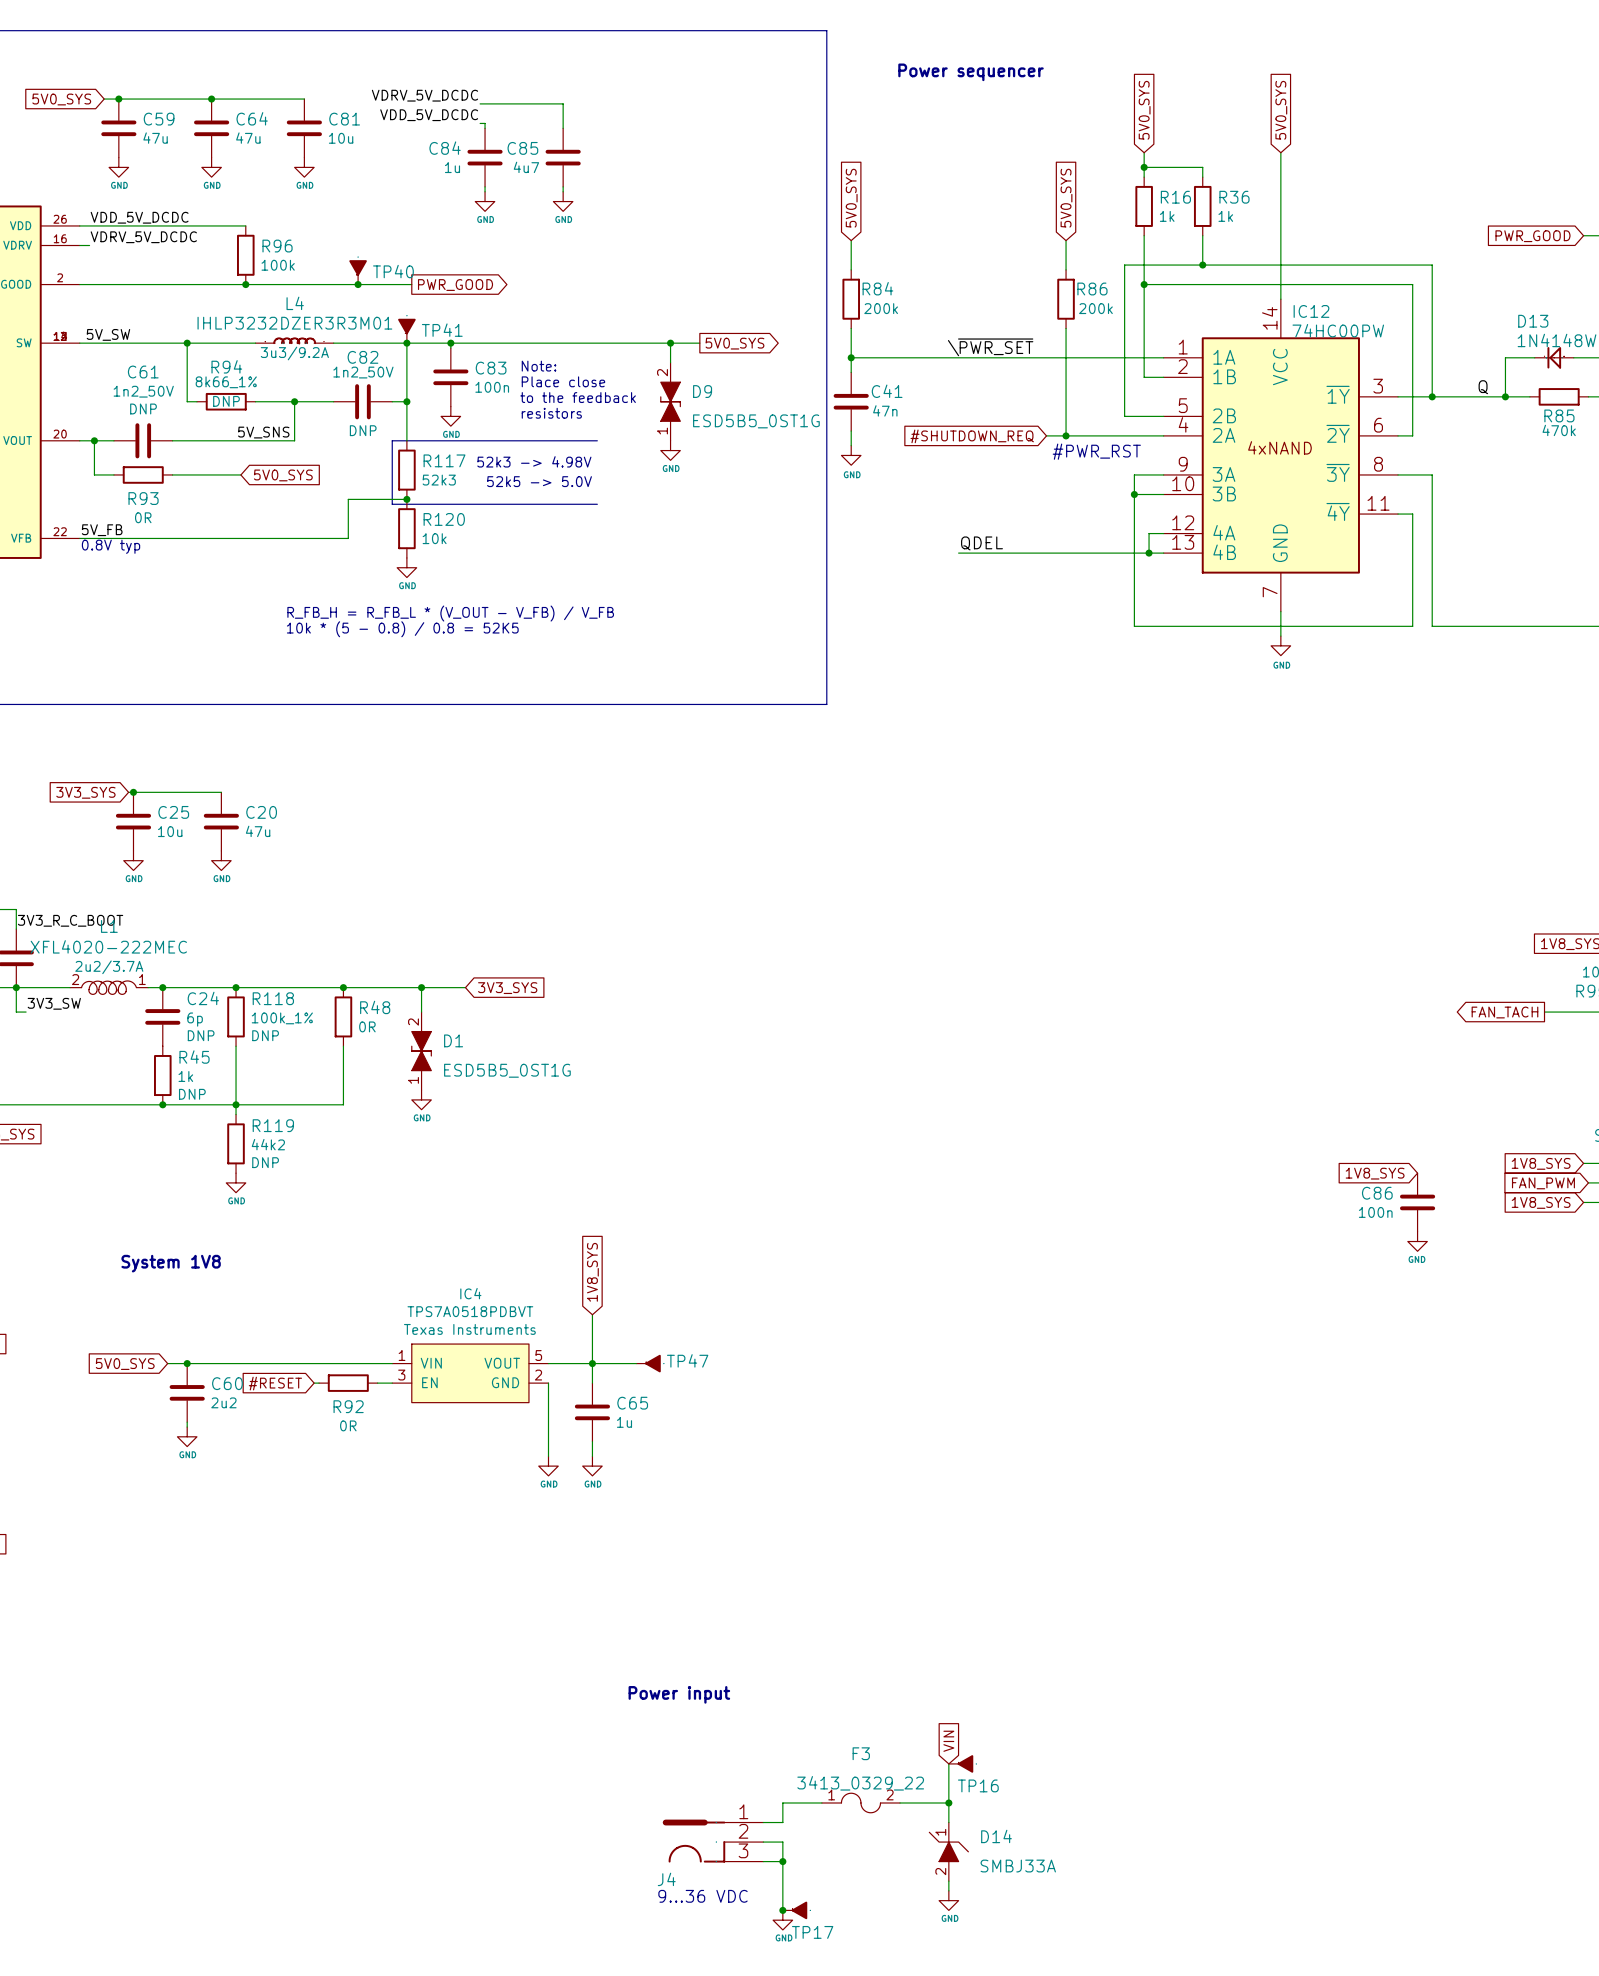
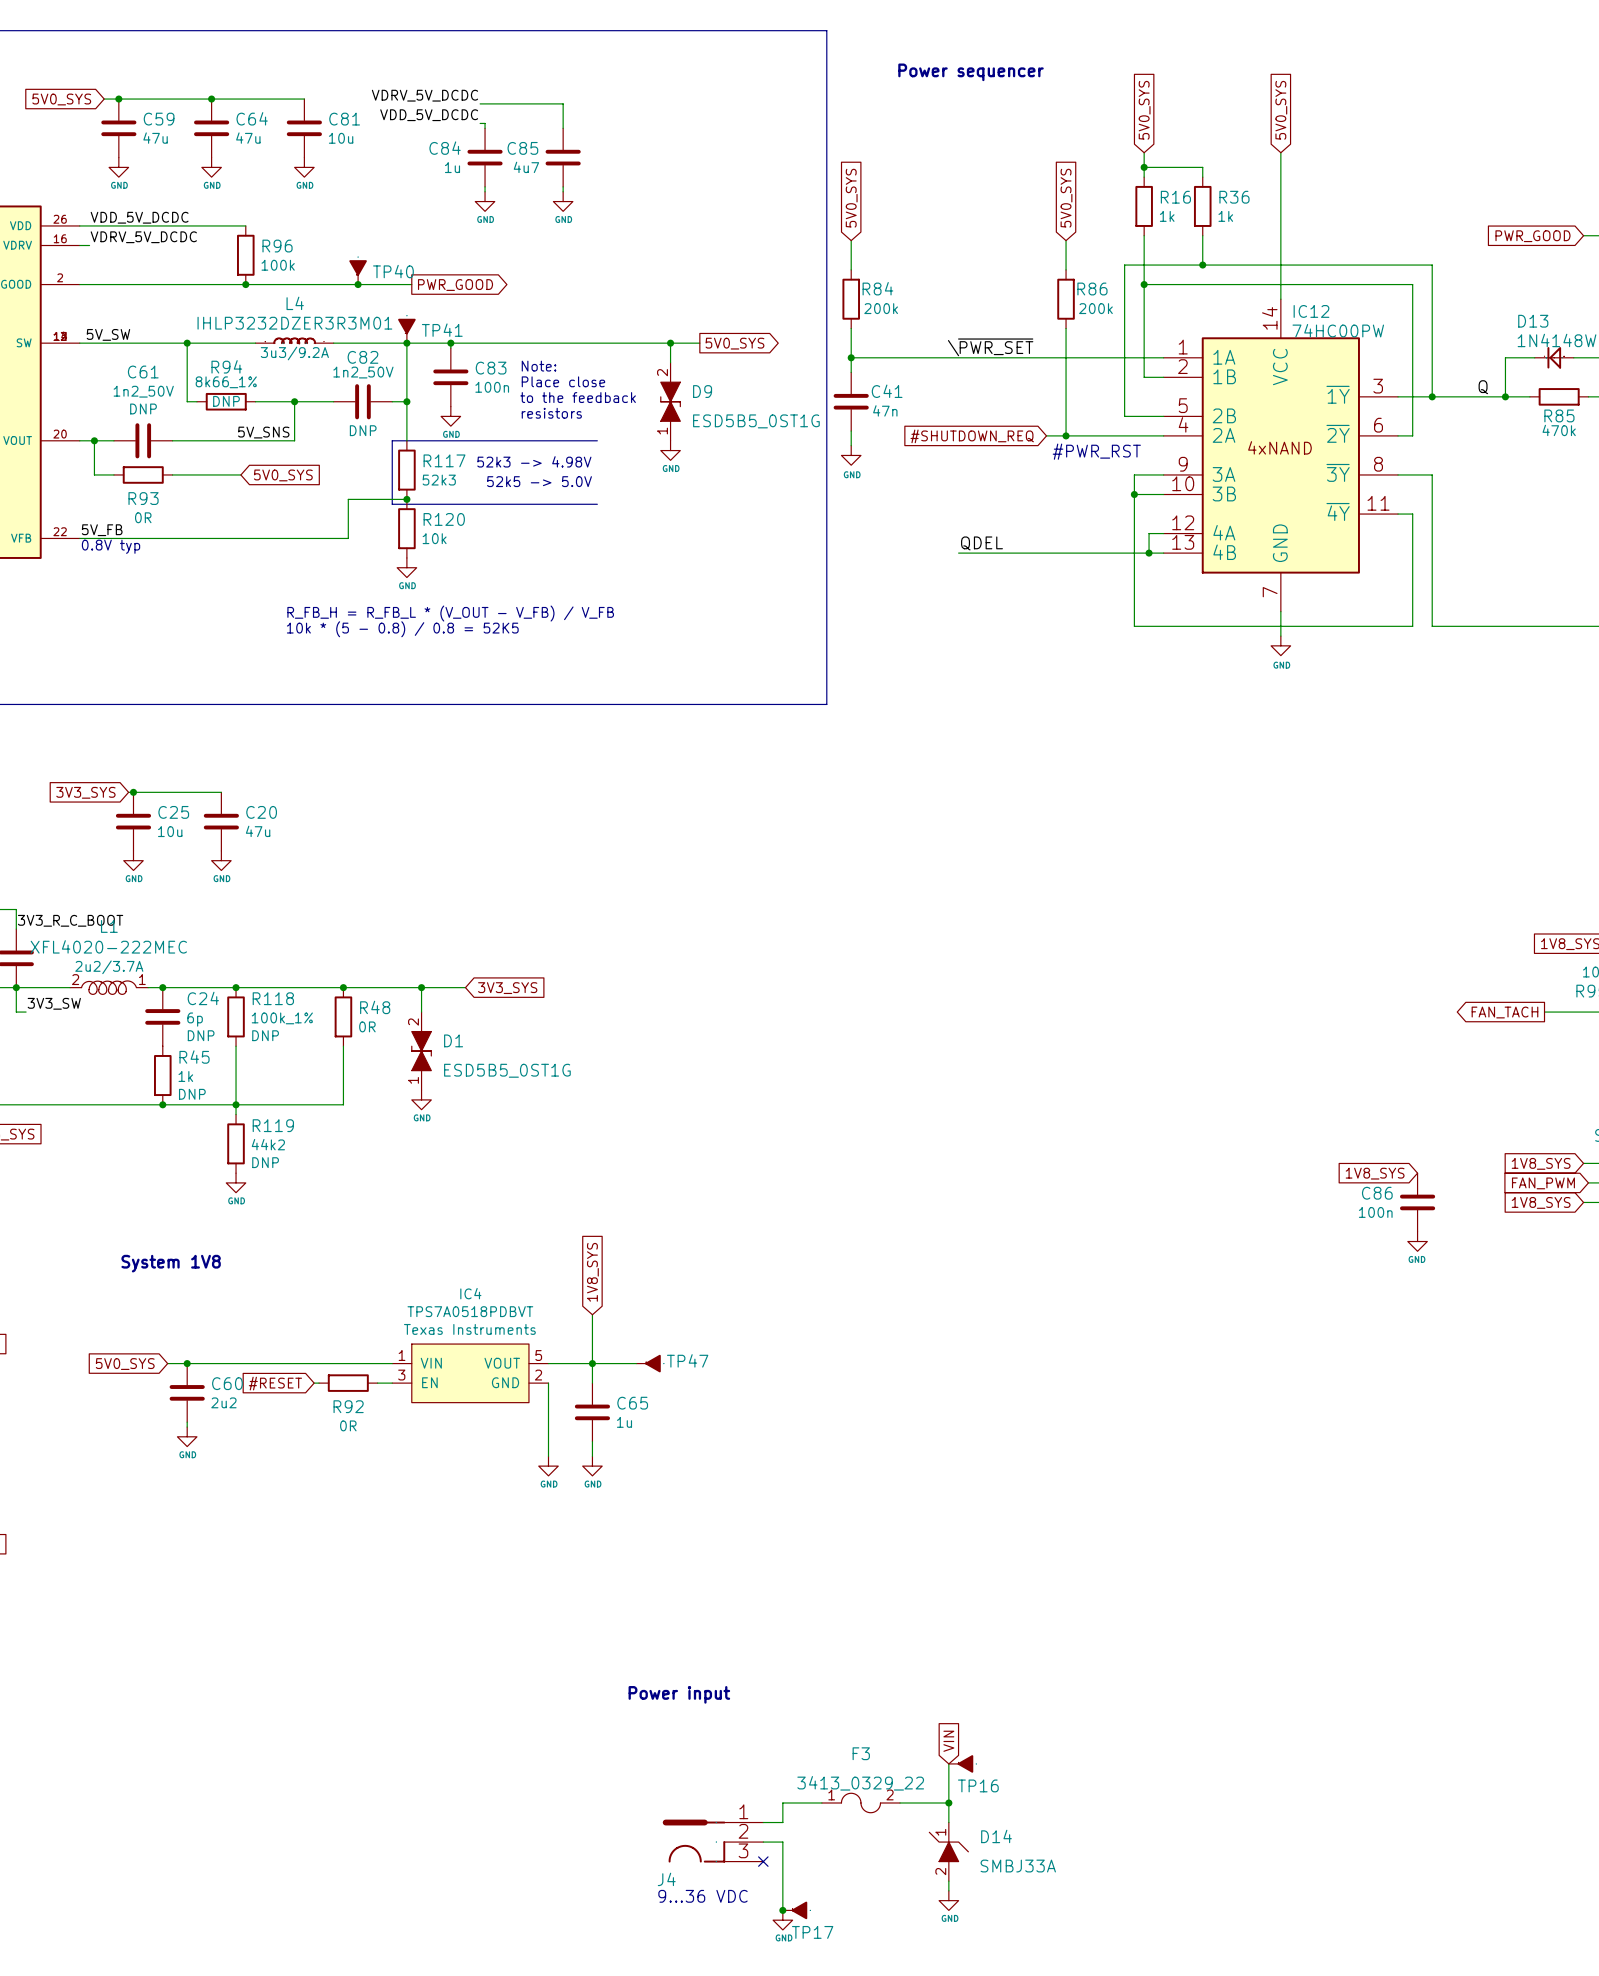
wire: (763, 1861) (782, 1861) -> none
no-connect mark: none -> (763, 1861)
junction: (782, 1861) -> none

